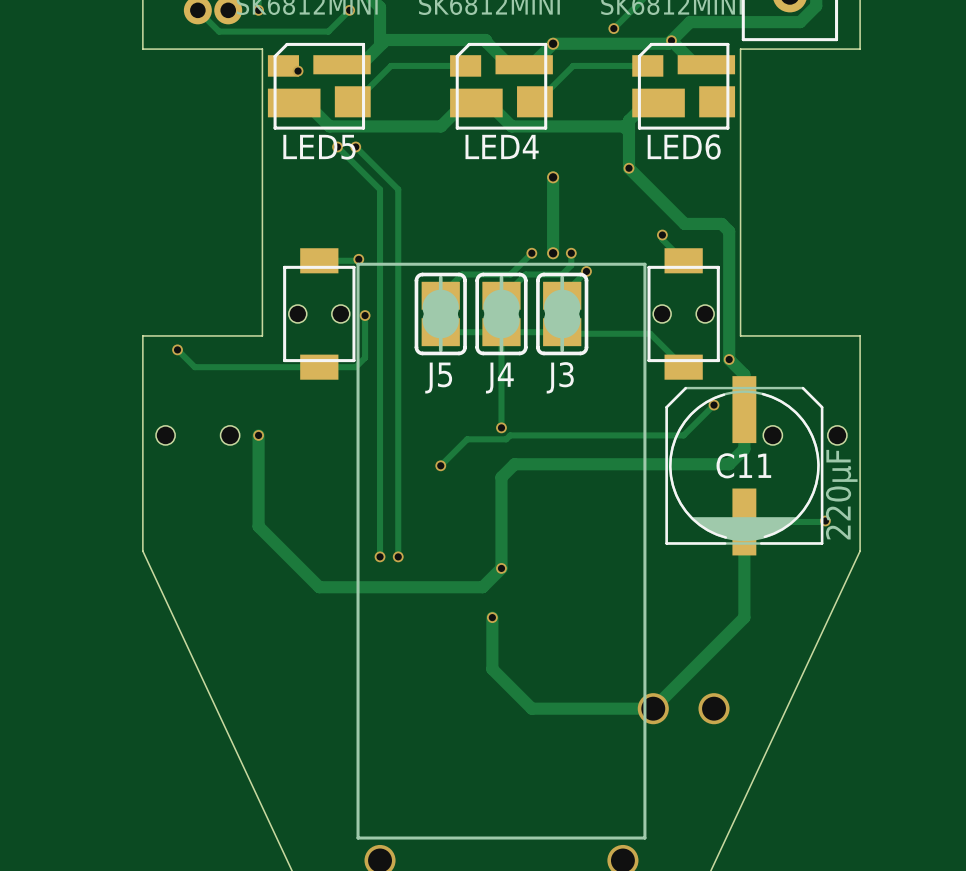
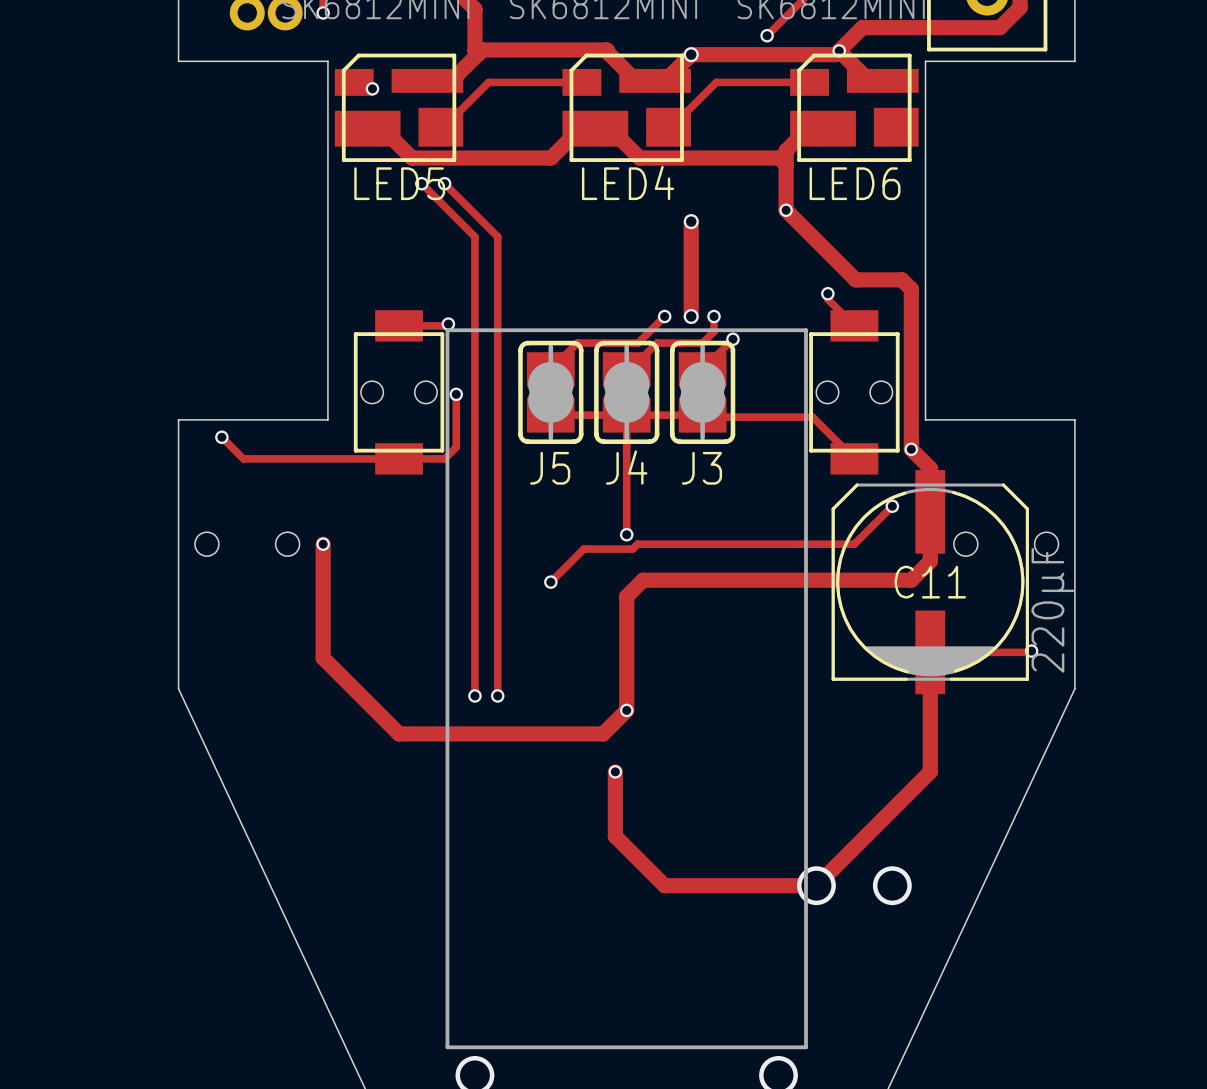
track: (197, 10) (219, 31) (328, 31) (349, 10) -> none
via: (349, 10) -> none

